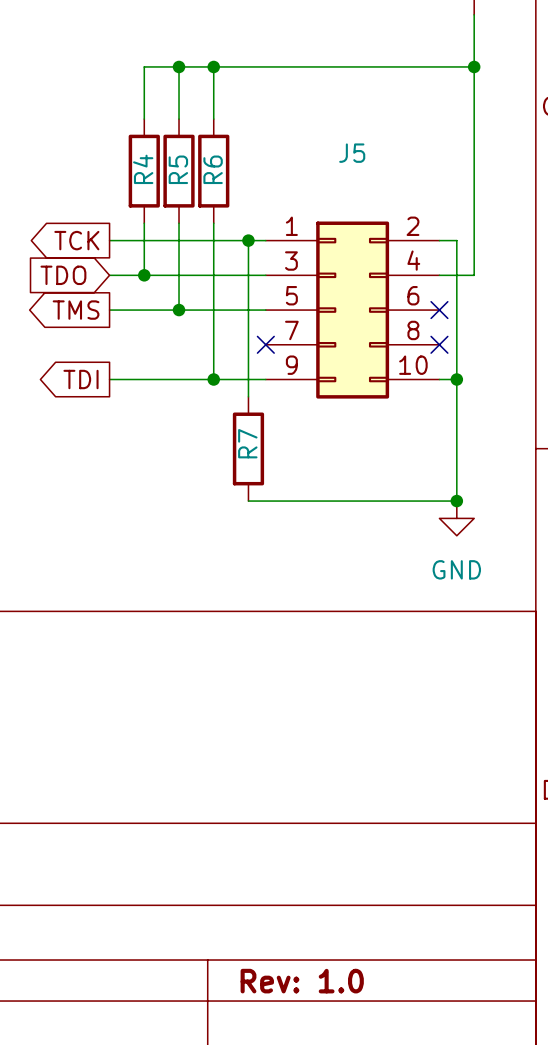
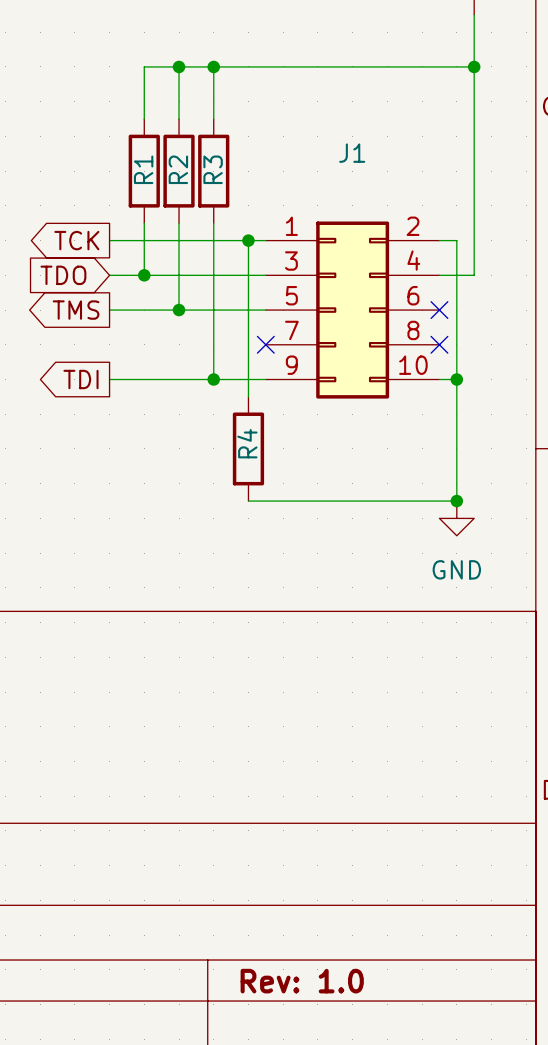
J5 name: J5 (352, 153) -> J1 (352, 153)
R4 name: R4 (143, 169) -> R1 (143, 169)
R5 name: R5 (178, 169) -> R2 (178, 169)
R6 name: R6 (213, 169) -> R3 (213, 169)
R7 name: R7 (247, 443) -> R4 (247, 443)

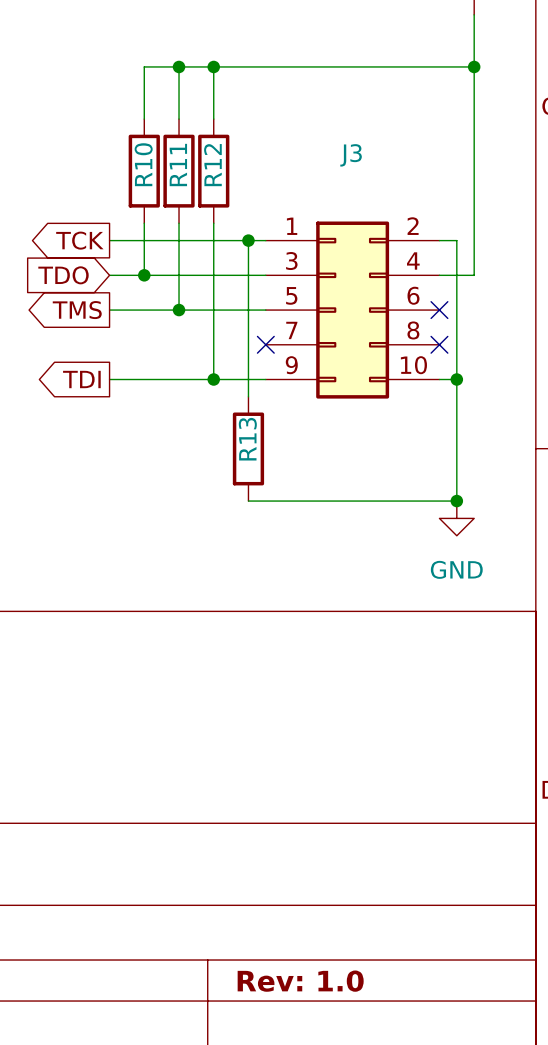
J1 name: J1 (352, 153) -> J3 (351, 155)
R1 name: R1 (143, 169) -> R10 (143, 164)
R2 name: R2 (178, 169) -> R11 (178, 165)
R3 name: R3 (213, 169) -> R12 (212, 165)
R4 name: R4 (247, 443) -> R13 (247, 439)

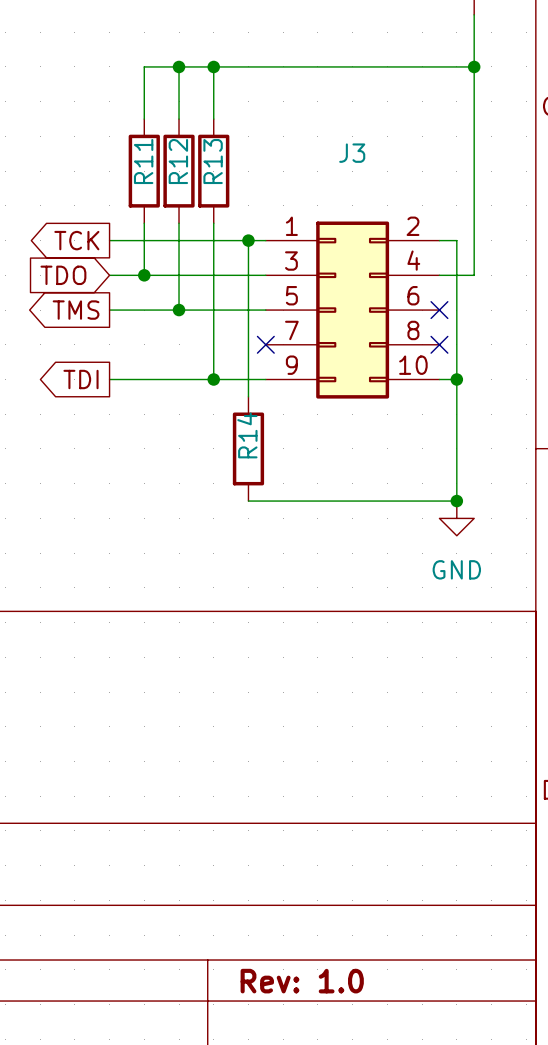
R10 name: R10 (143, 164) -> R11 (143, 161)
R11 name: R11 (178, 165) -> R12 (178, 161)
R12 name: R12 (212, 165) -> R13 (213, 161)
R13 name: R13 (247, 439) -> R14 (247, 435)

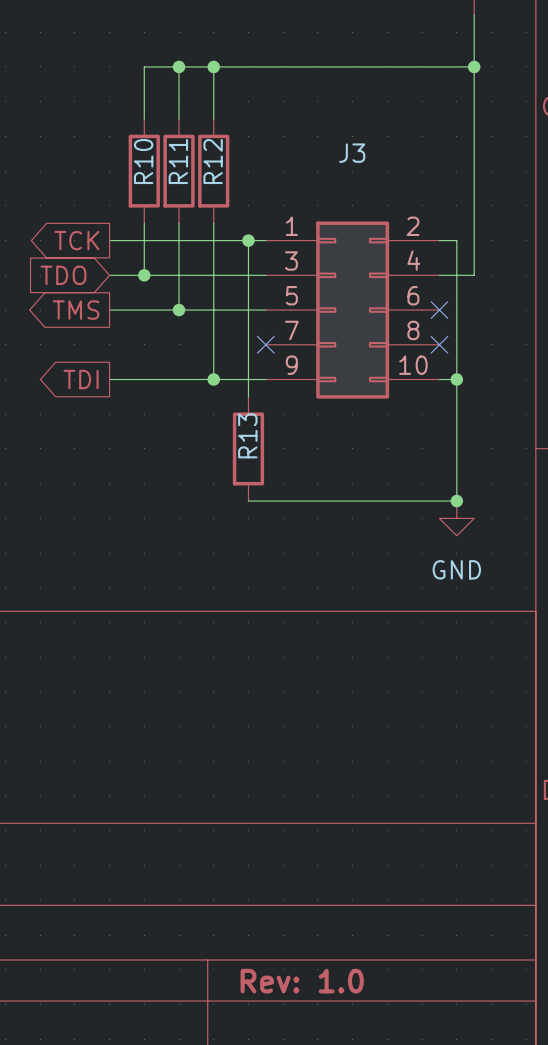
R11 name: R11 (143, 161) -> R10 (143, 161)
R12 name: R12 (178, 161) -> R11 (178, 161)
R13 name: R13 (213, 161) -> R12 (213, 161)
R14 name: R14 (247, 435) -> R13 (247, 435)

